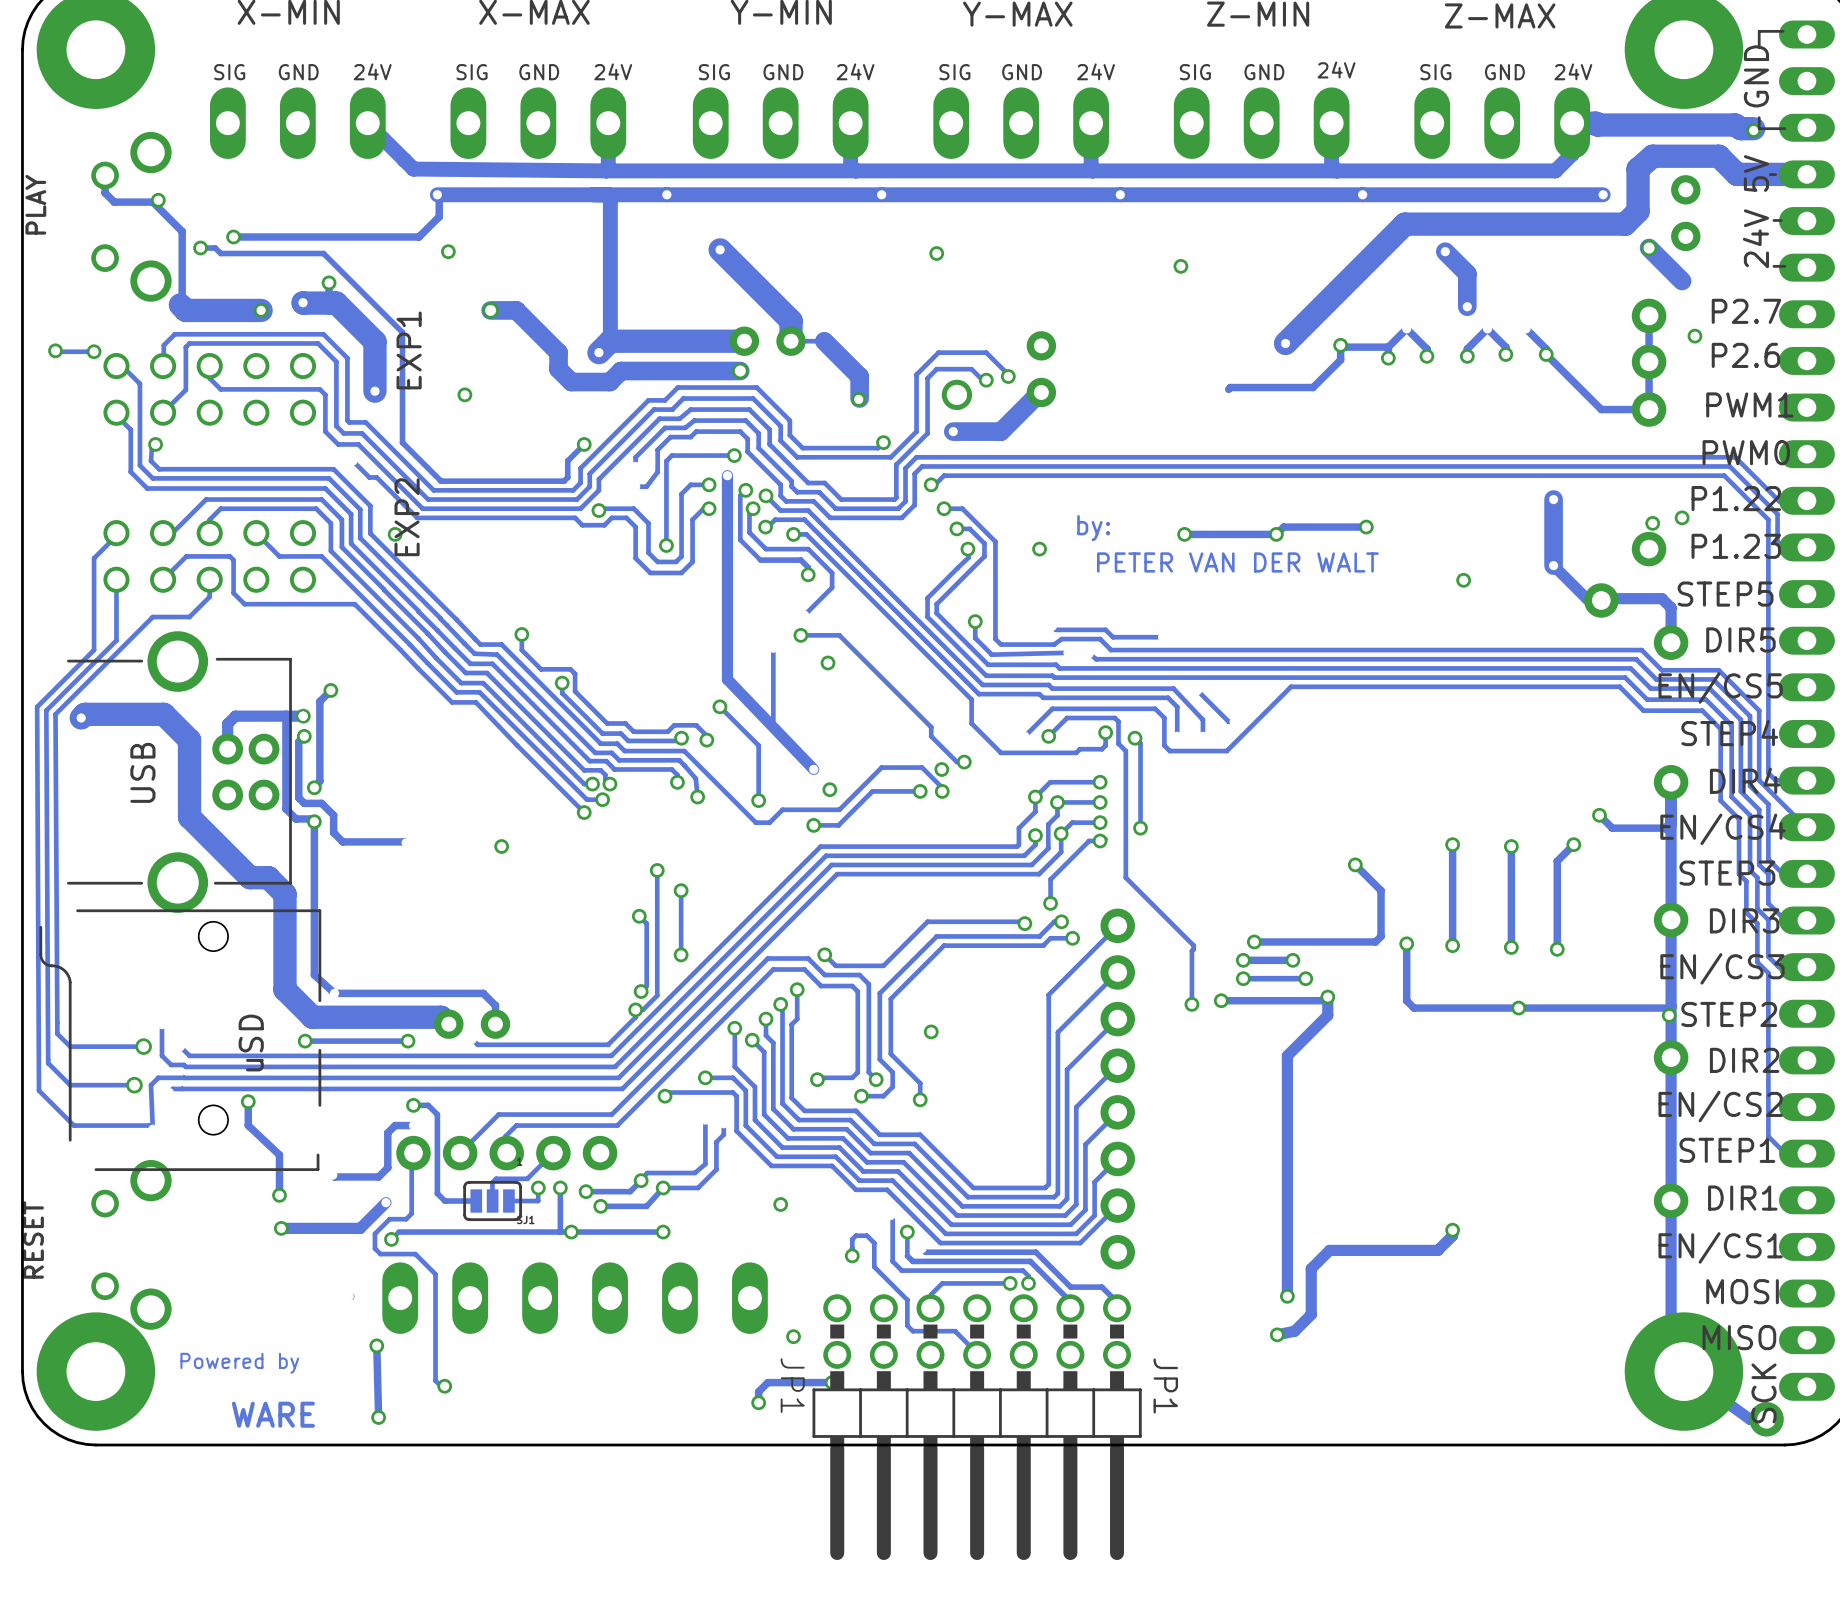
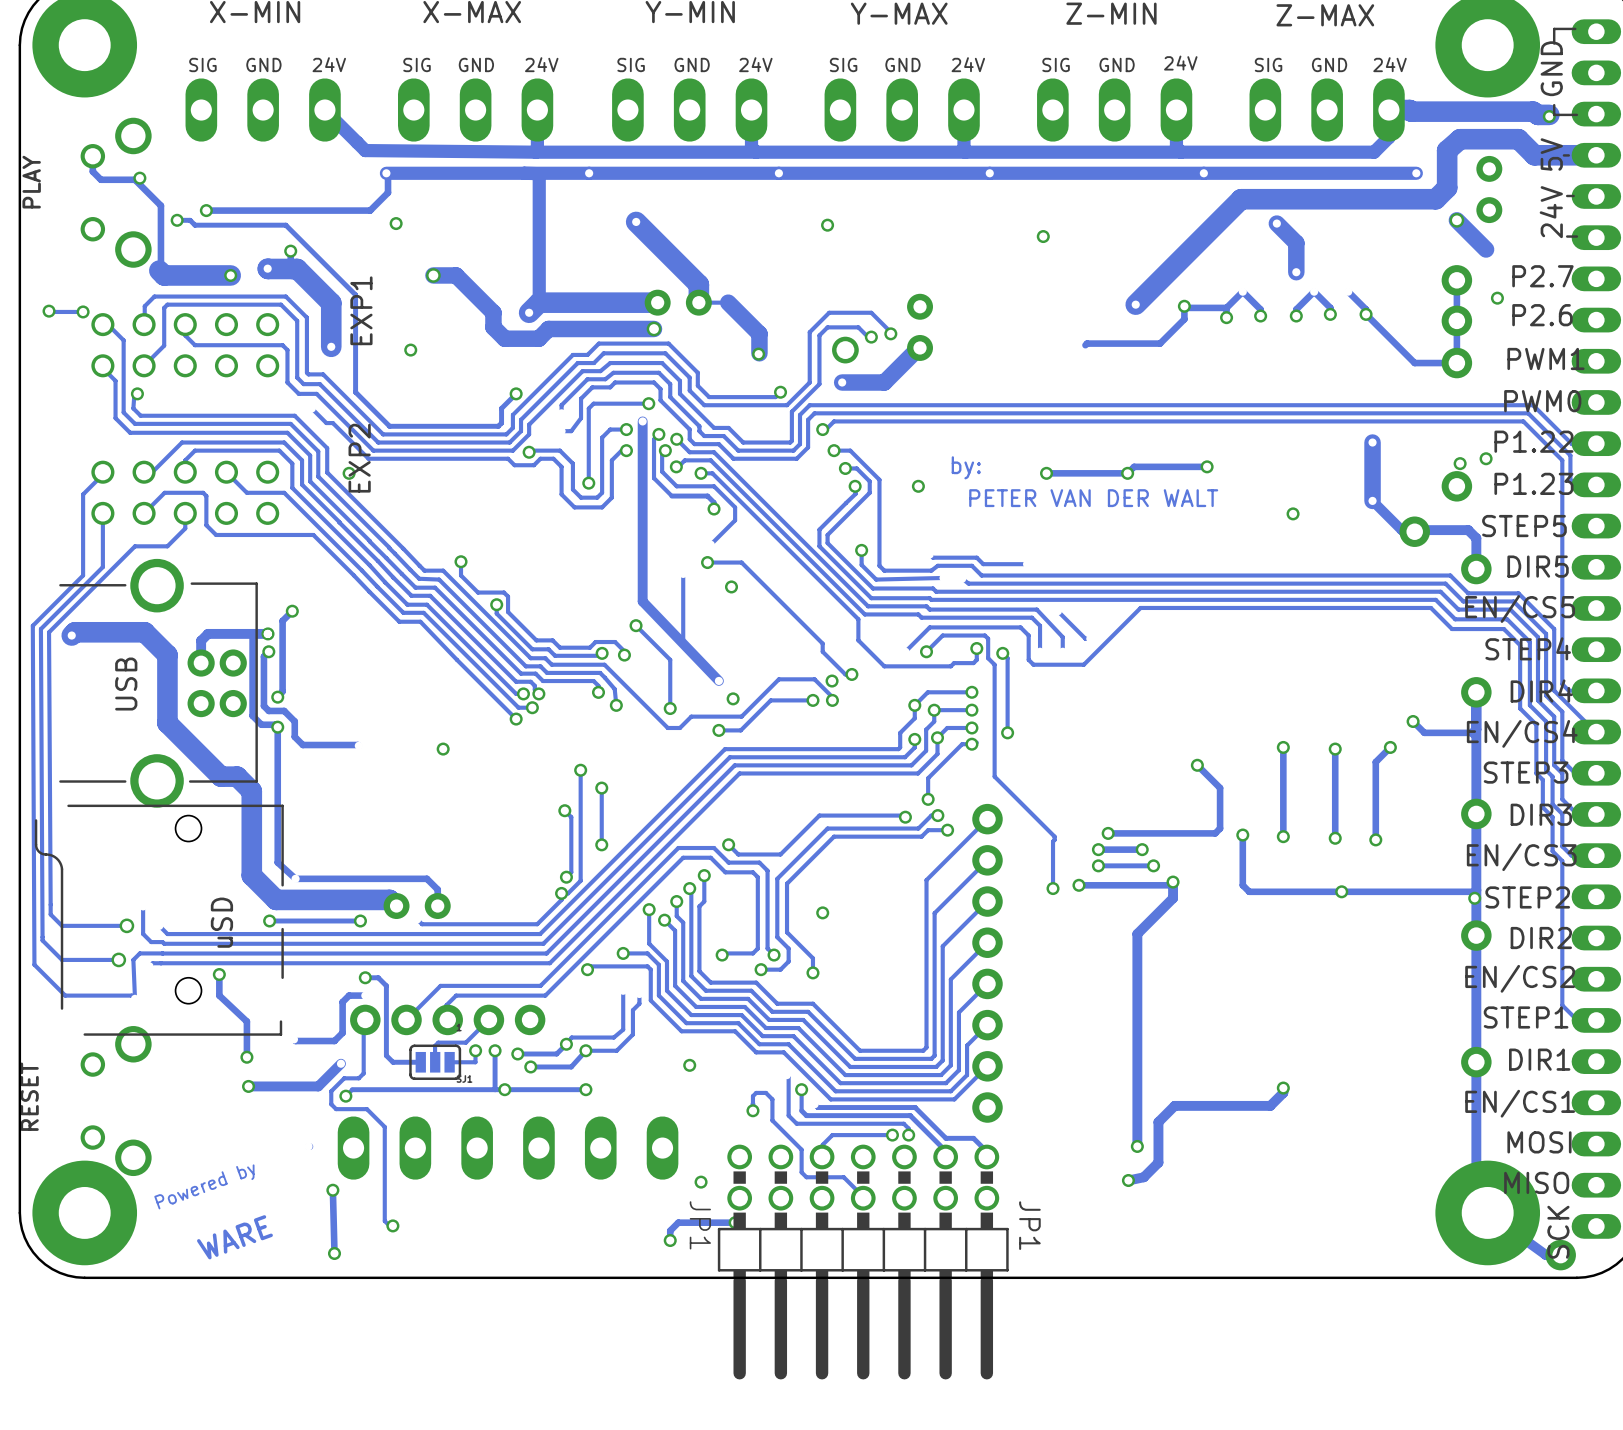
text rotation: 0° (239, 1363) -> 20° counterclockwise (204, 1186)
text rotation: 0° (273, 1414) -> 20° counterclockwise (234, 1237)

